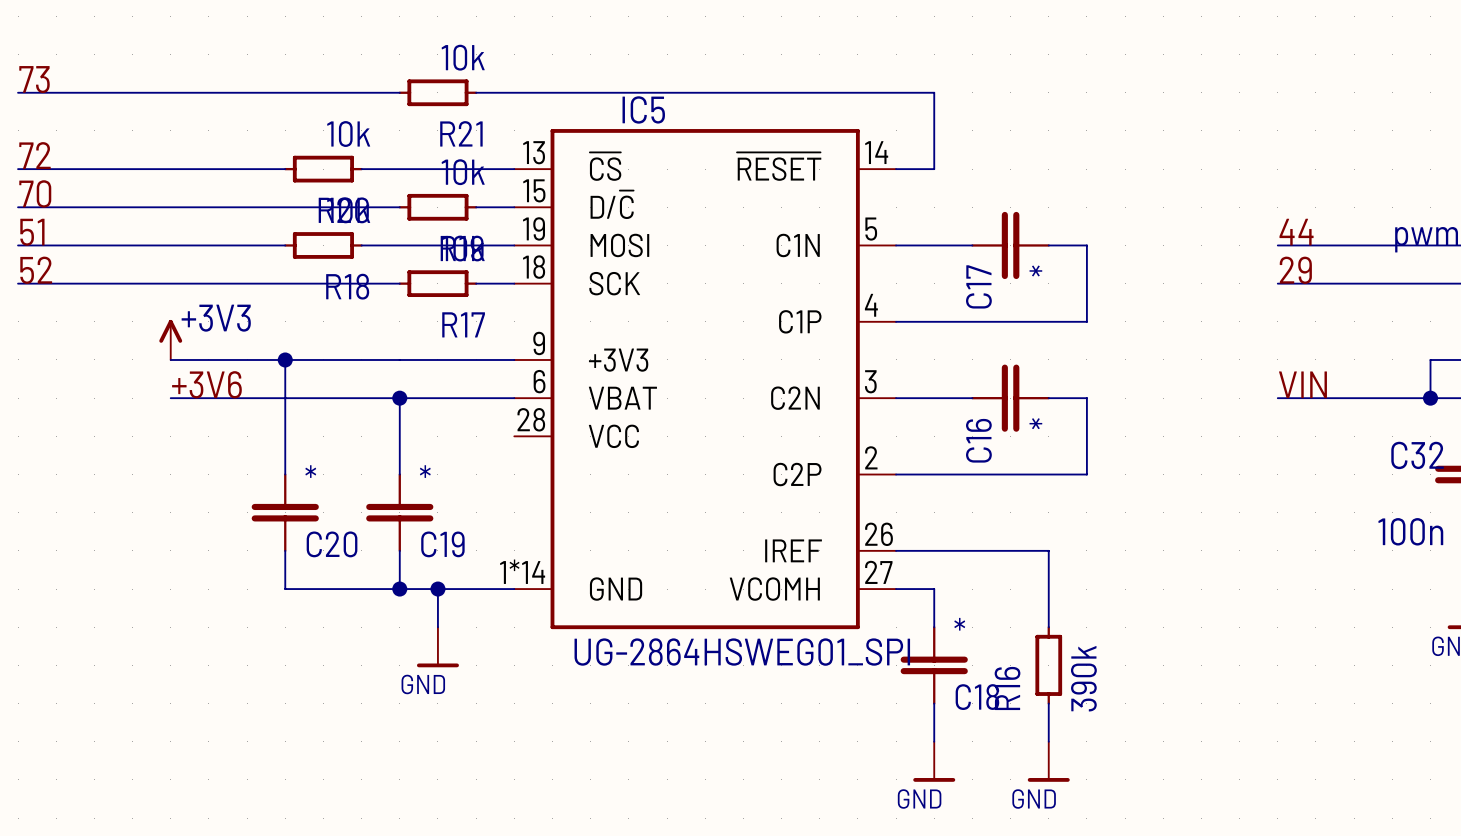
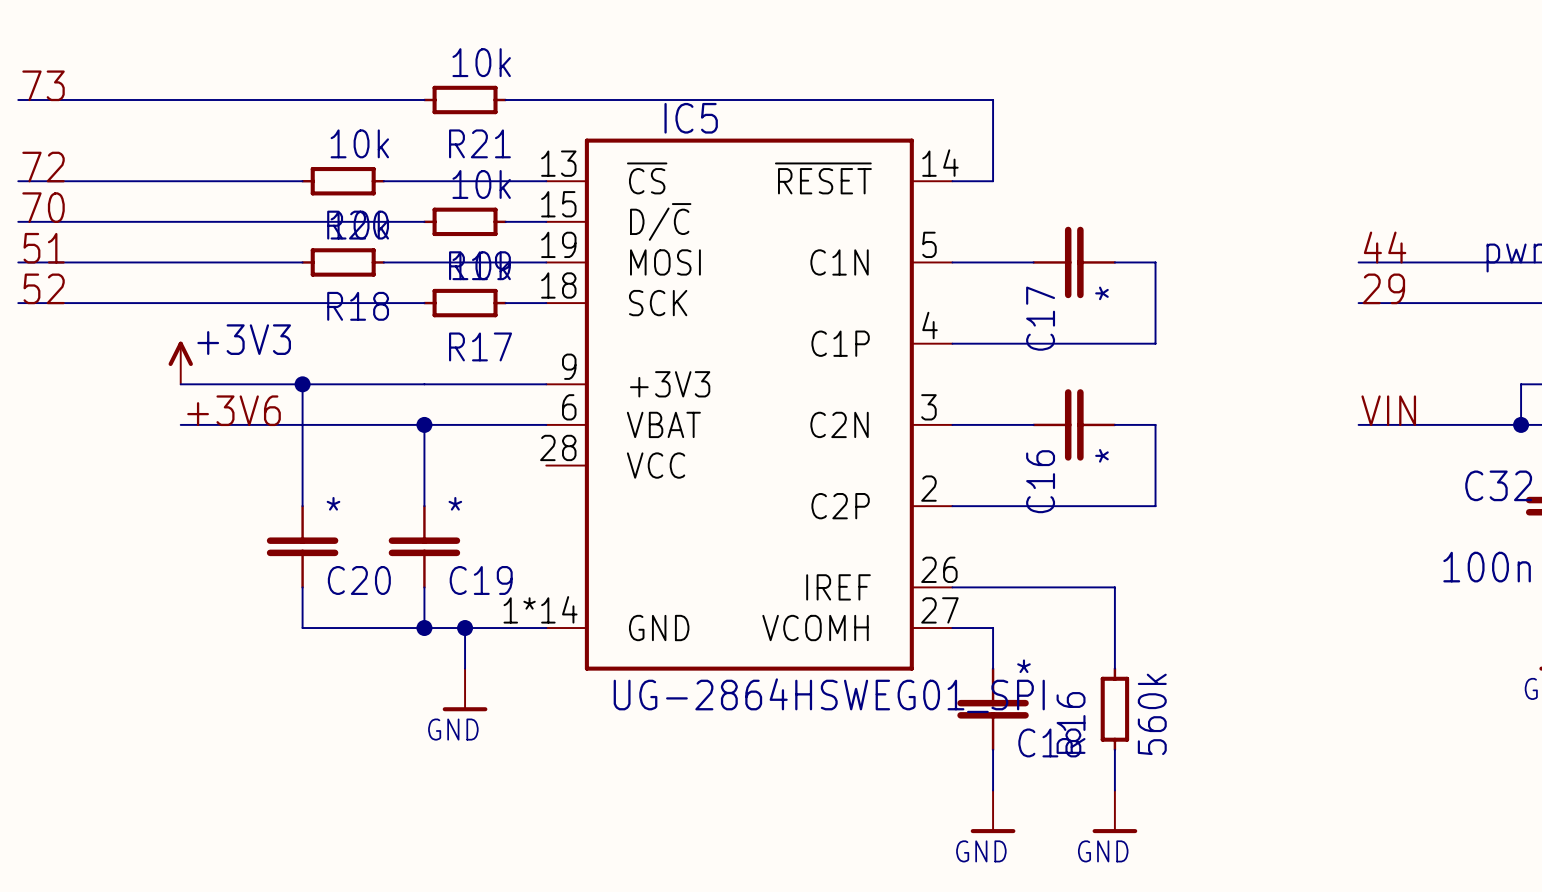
R16 value: 390k (1083, 678) -> 560k (1152, 714)

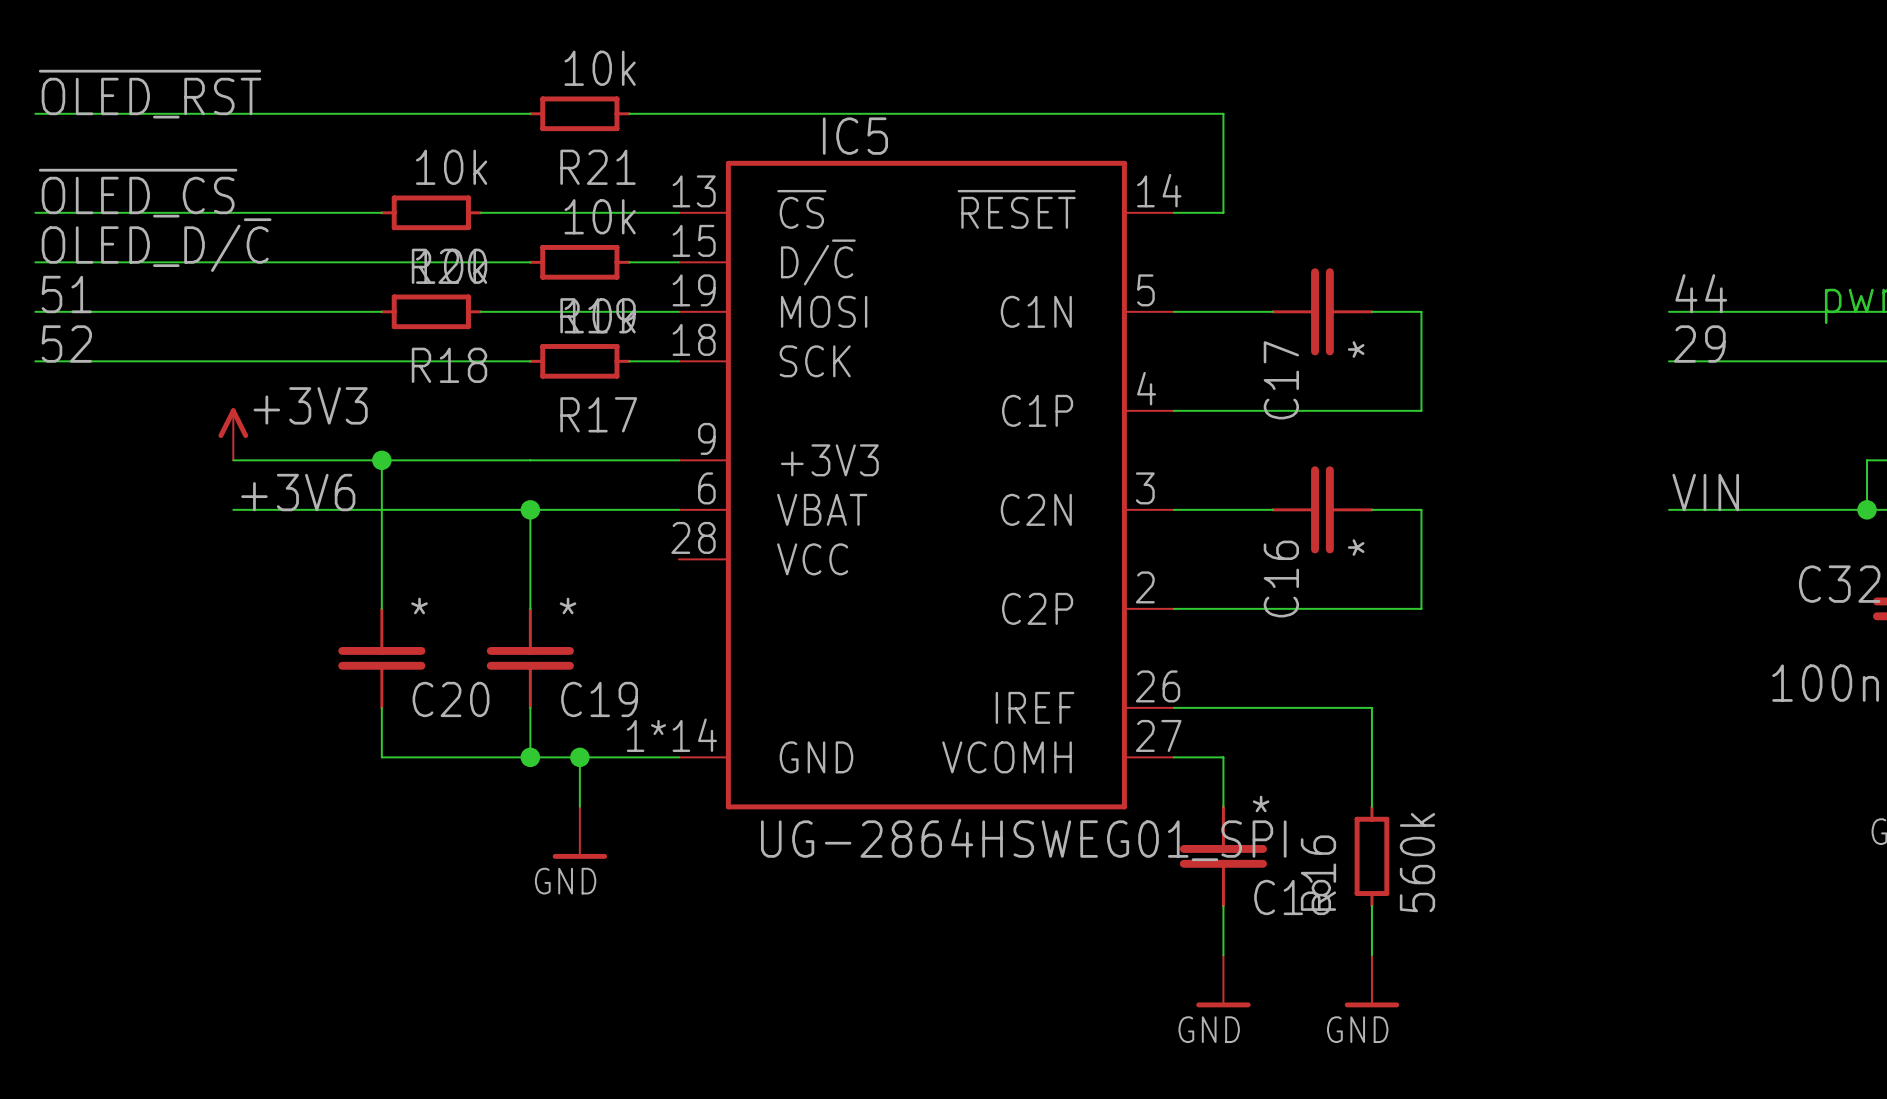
label: 73 (43, 85) -> ~{OLED_RST} (150, 94)
label: 72 (43, 167) -> ~{OLED_CS} (138, 193)
label: 70 (43, 207) -> OLED_D/~{C} (156, 245)

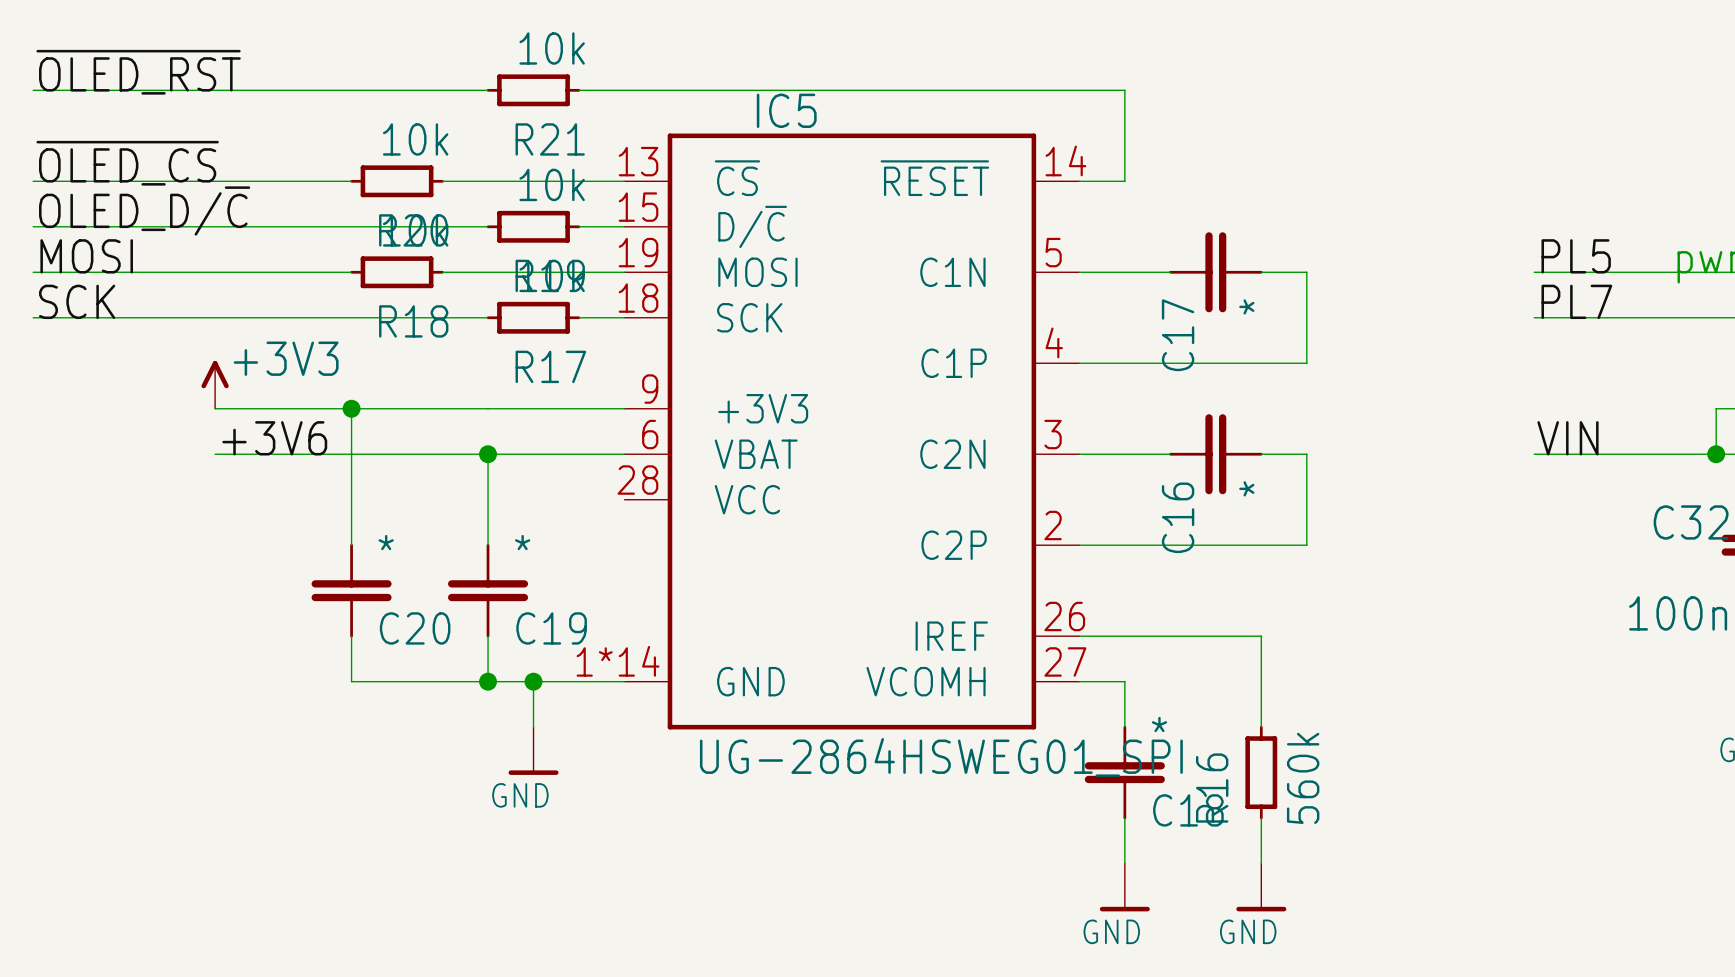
label: 44 (1701, 293) -> PL5 (1576, 256)
label: 51 (66, 294) -> MOSI (86, 256)
label: 52 (66, 344) -> SCK (77, 301)
label: 29 (1699, 344) -> PL7 (1576, 301)

